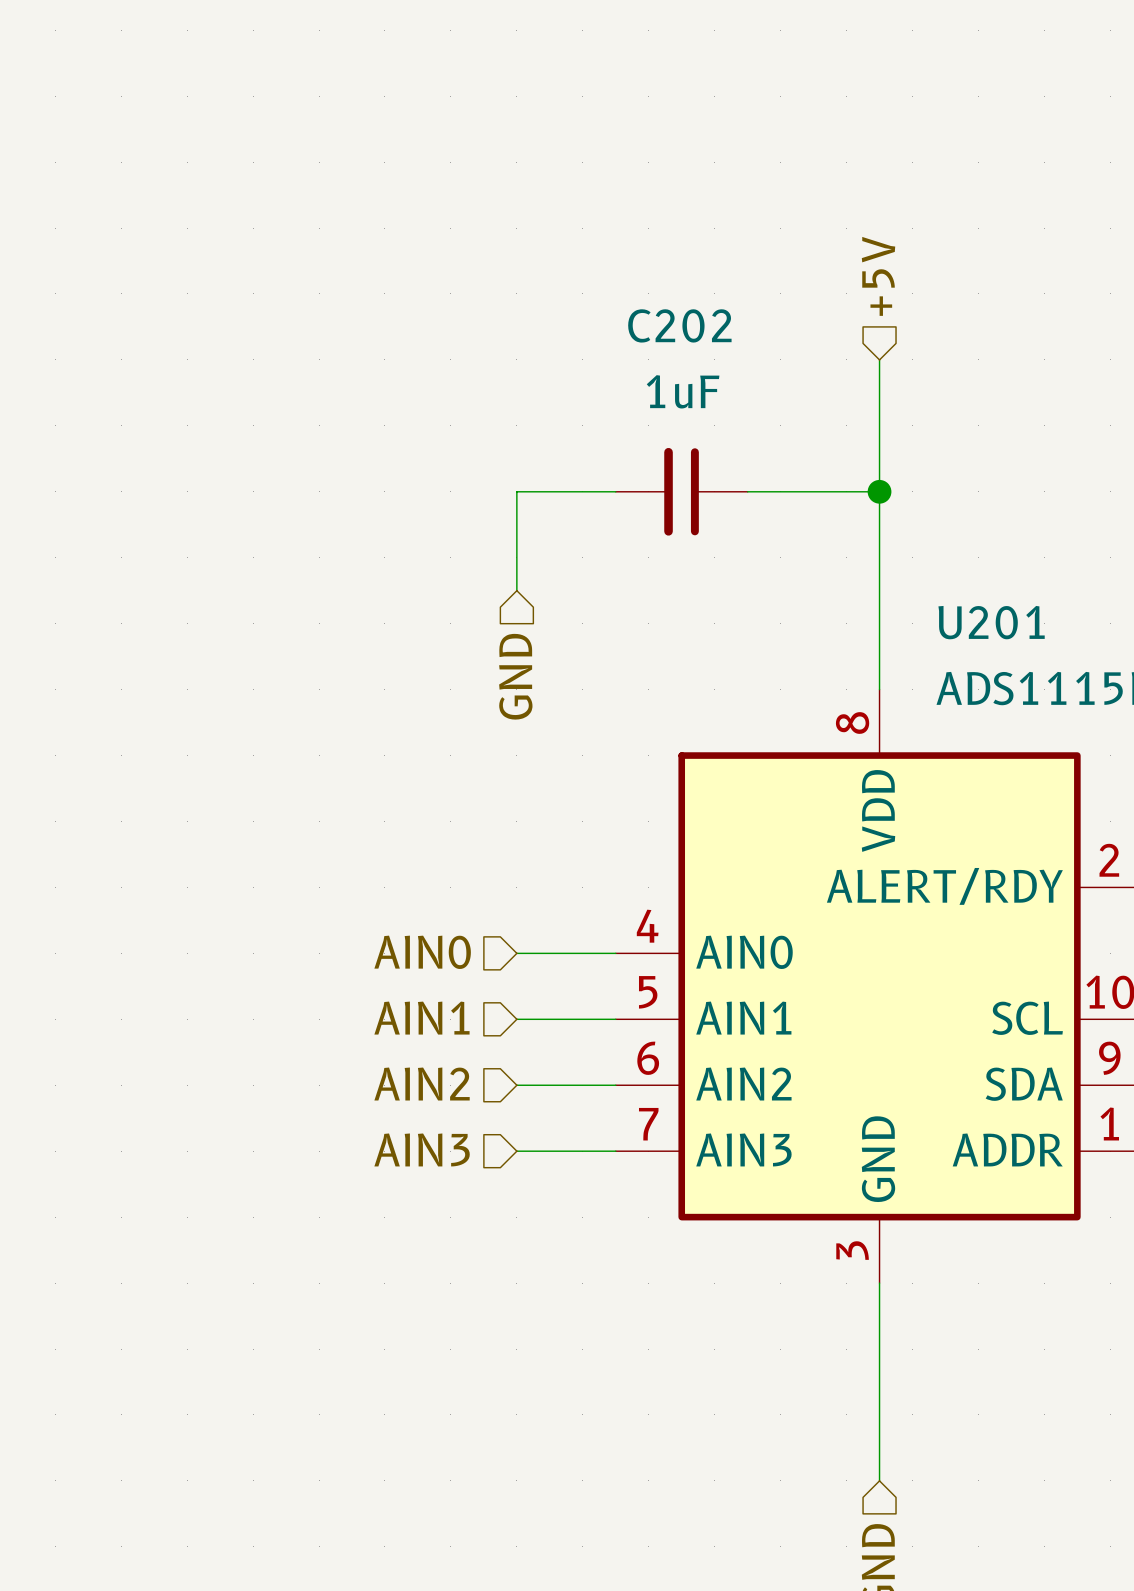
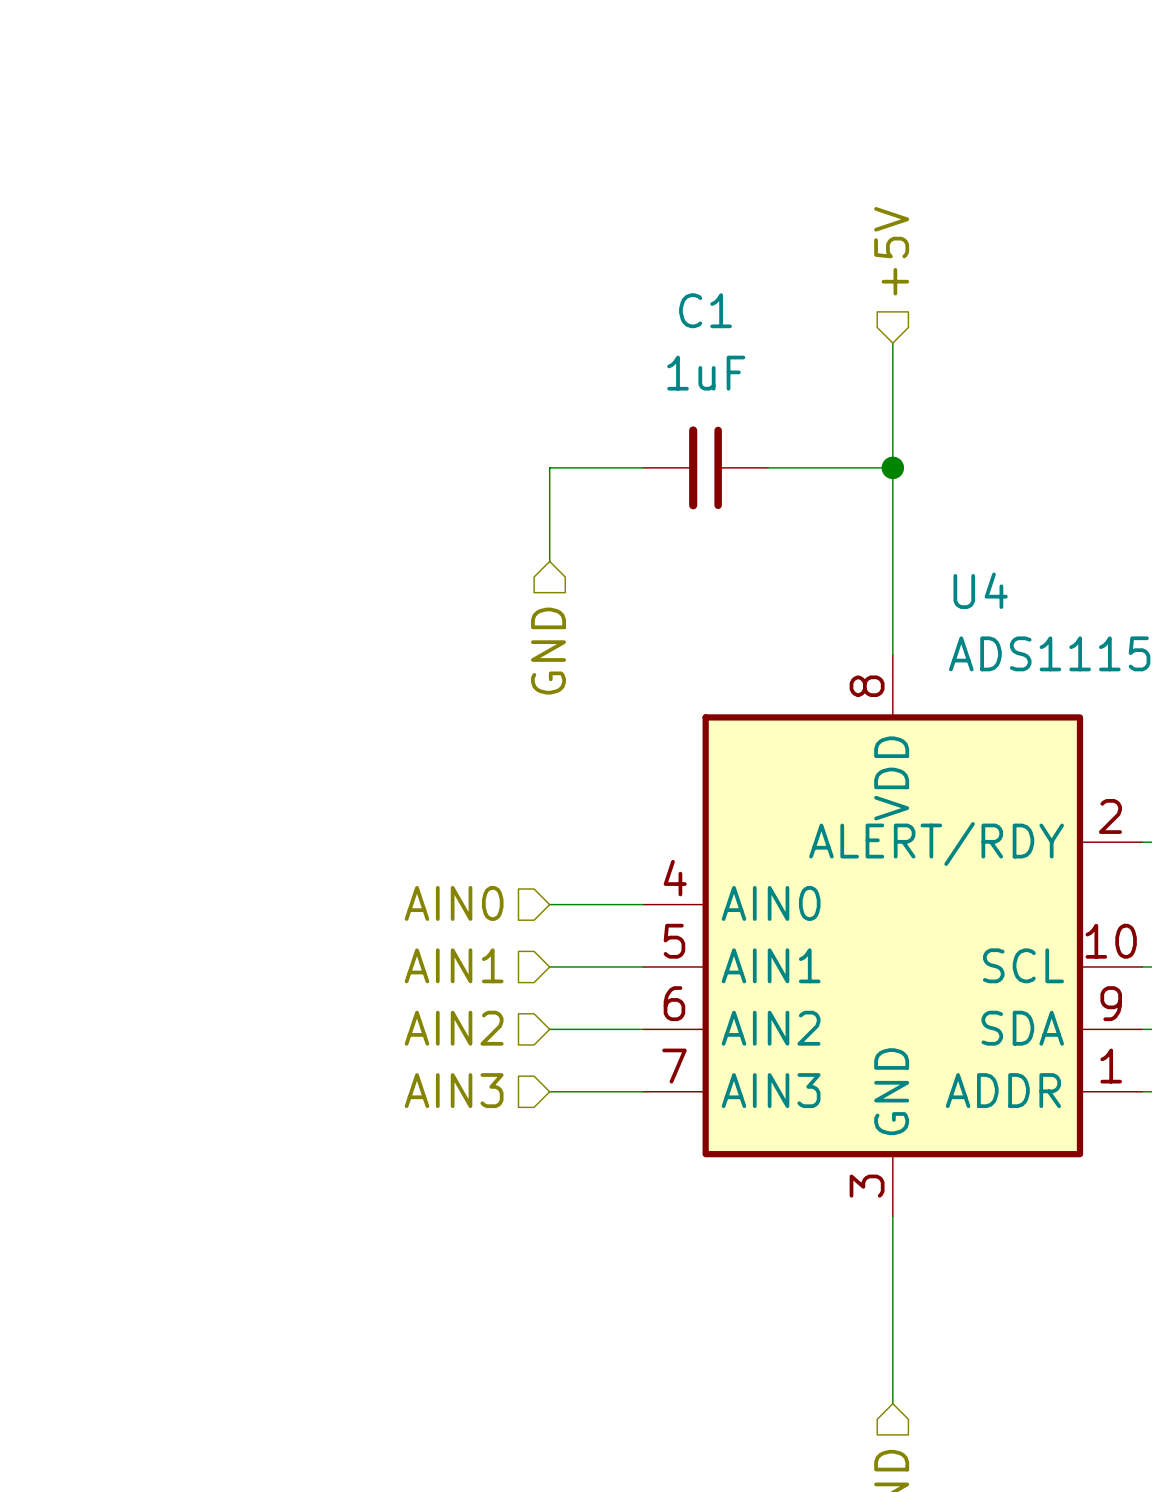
C202 name: C202 (679, 325) -> C1 (705, 310)
U201 name: U201 (991, 622) -> U4 (980, 590)

